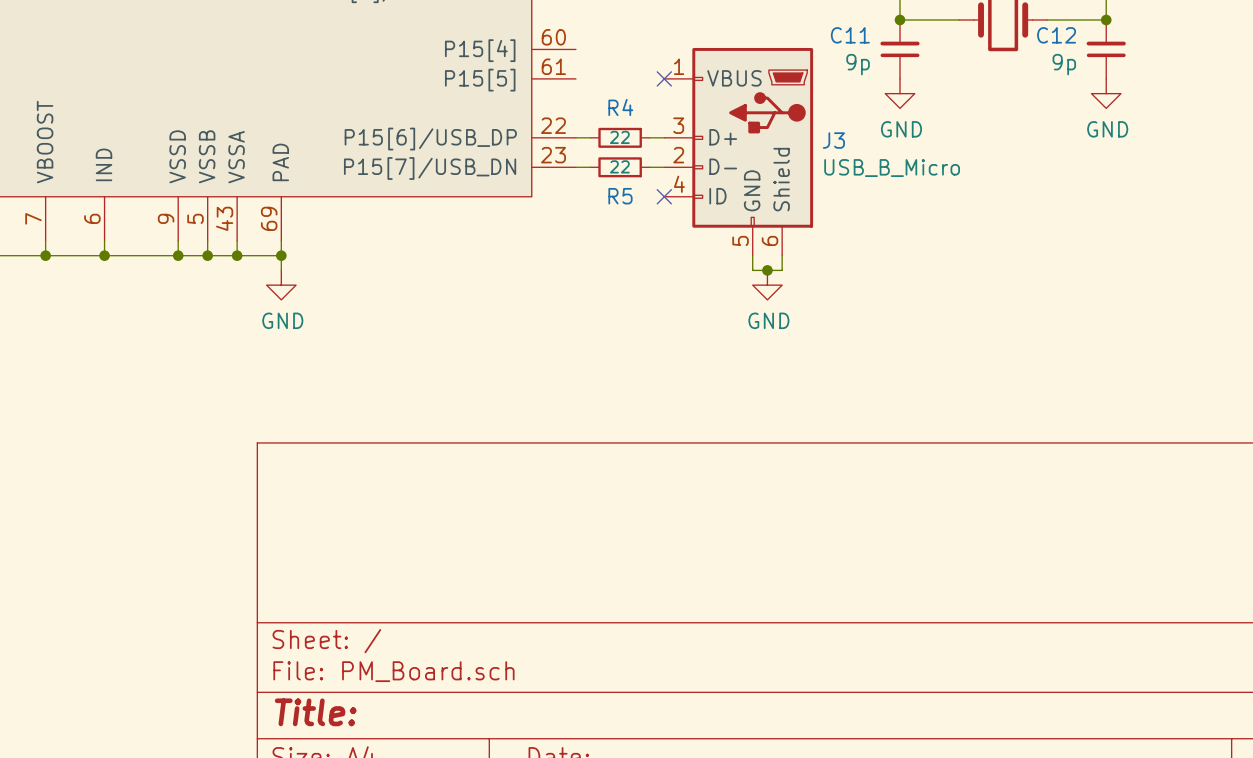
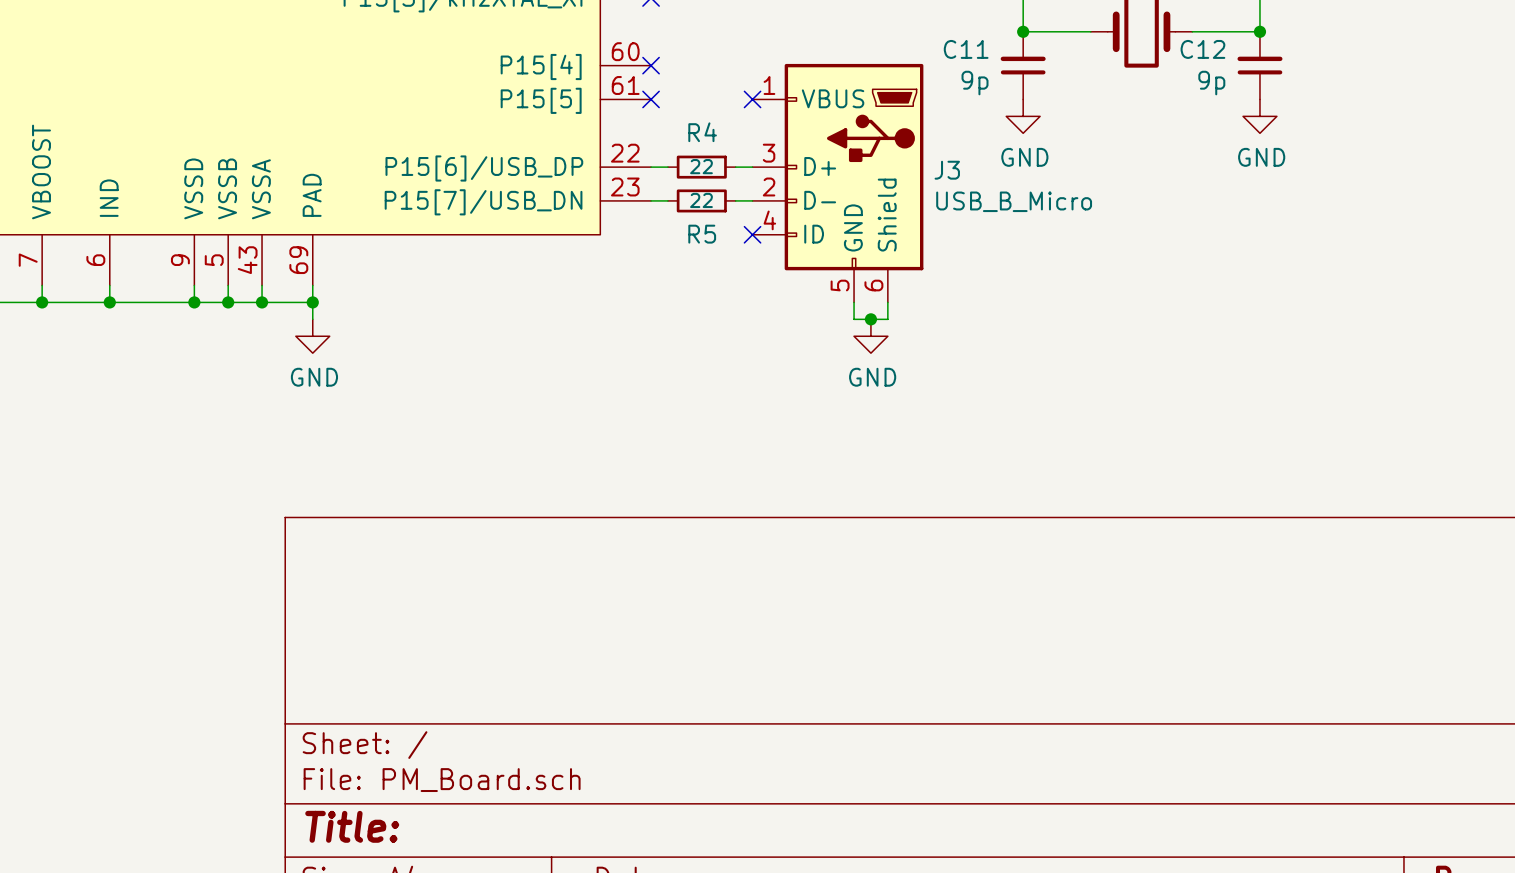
no-connect mark: none -> (651, 65)
no-connect mark: none -> (651, 99)

